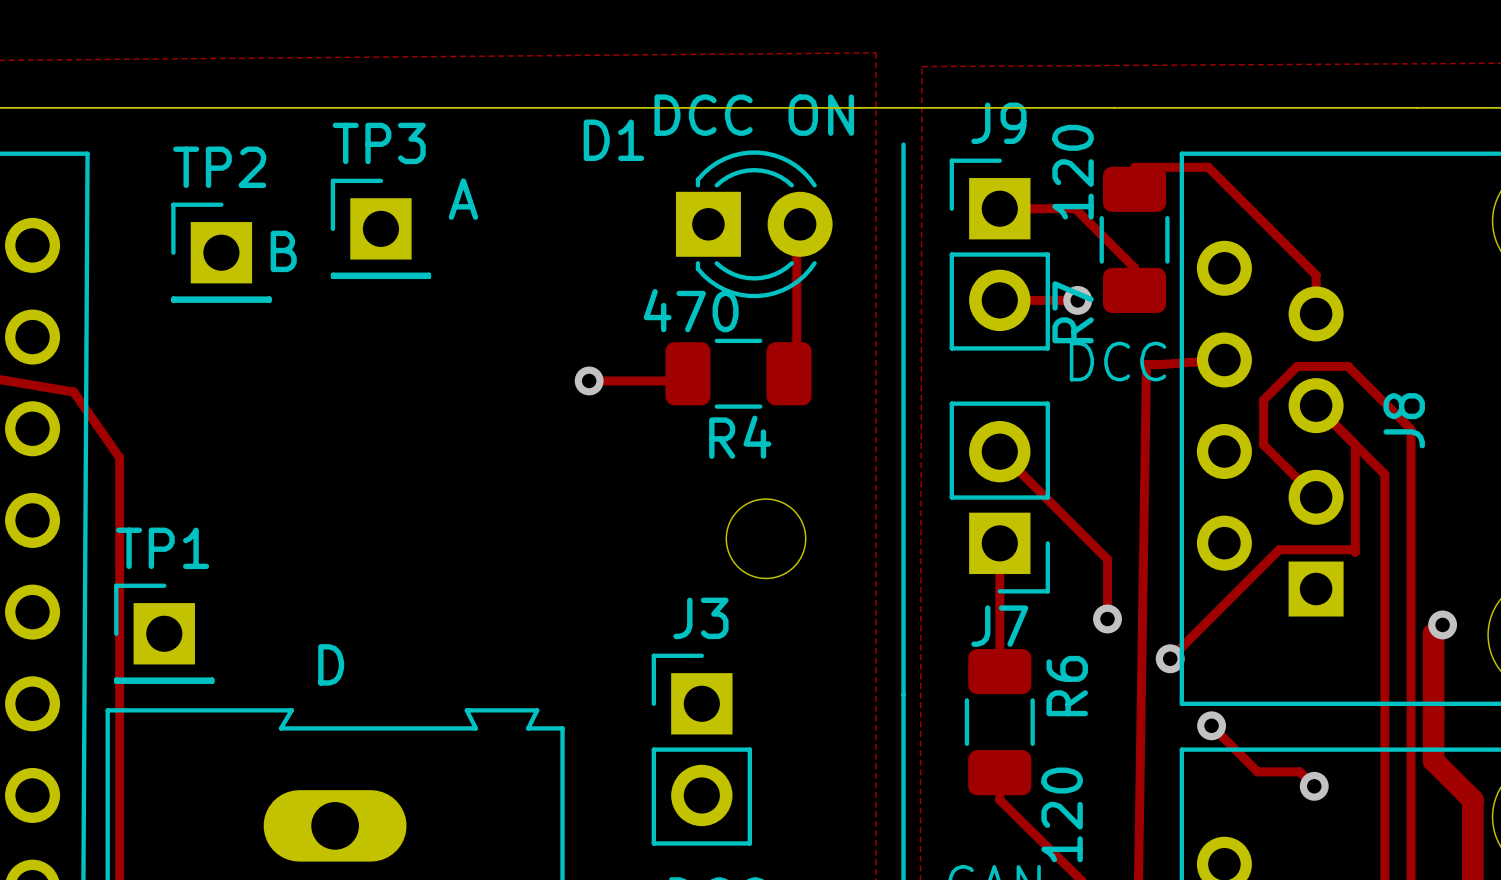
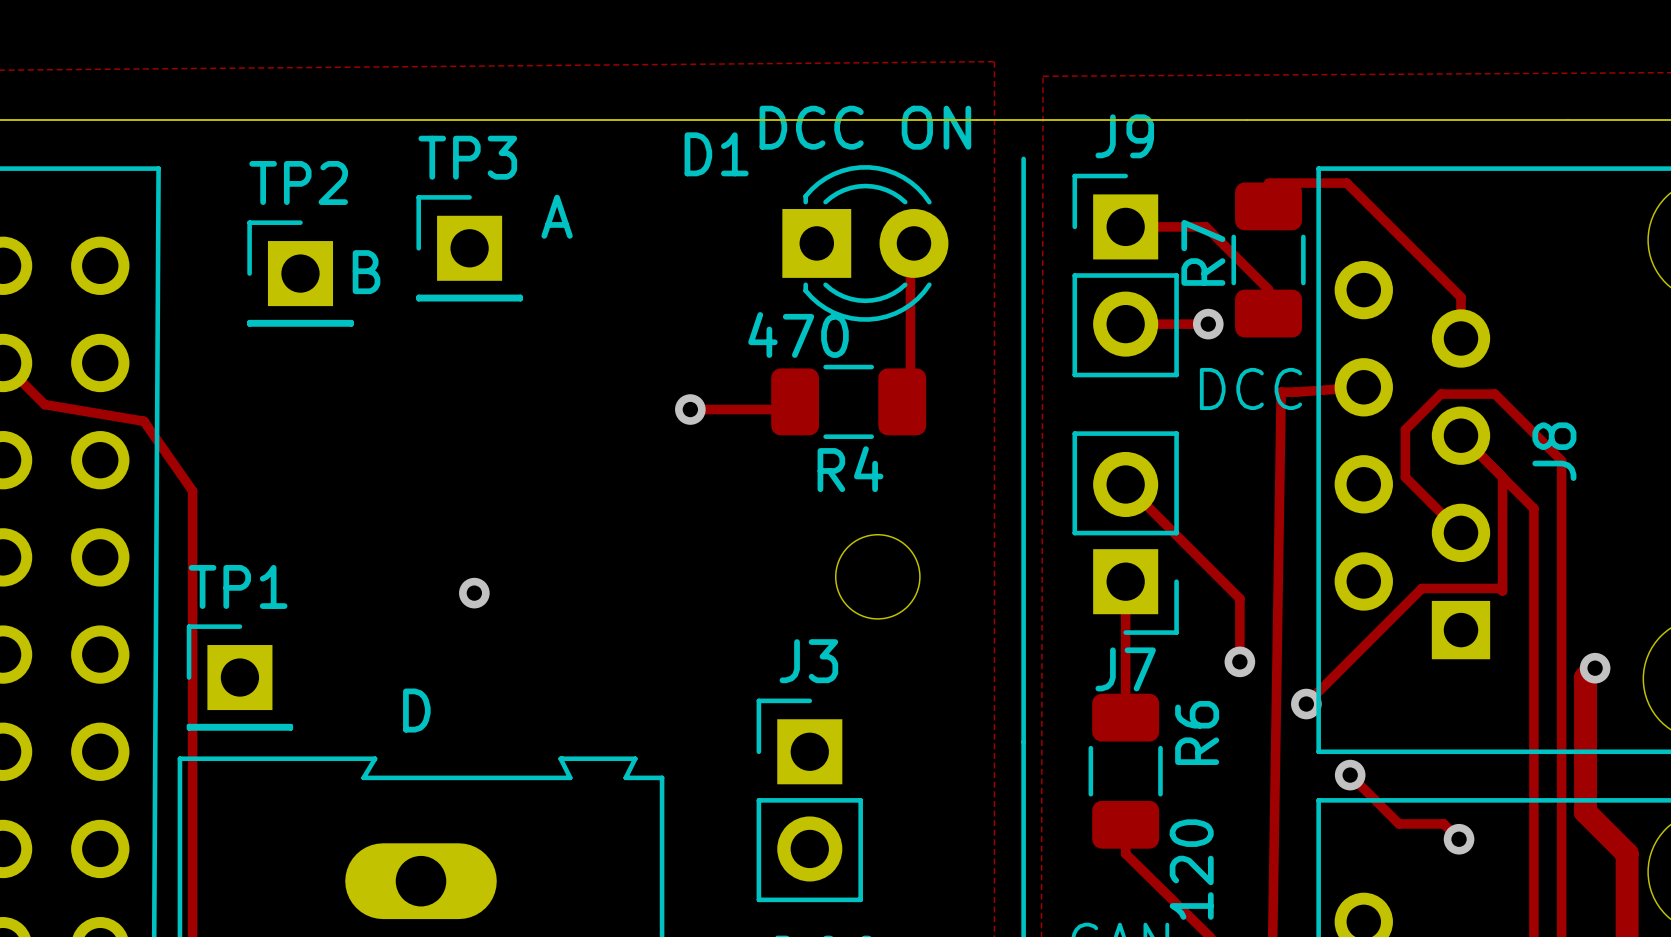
R7 120 name: R7 120 (1073, 234) -> R7 (1203, 252)
via: none -> (474, 593)

